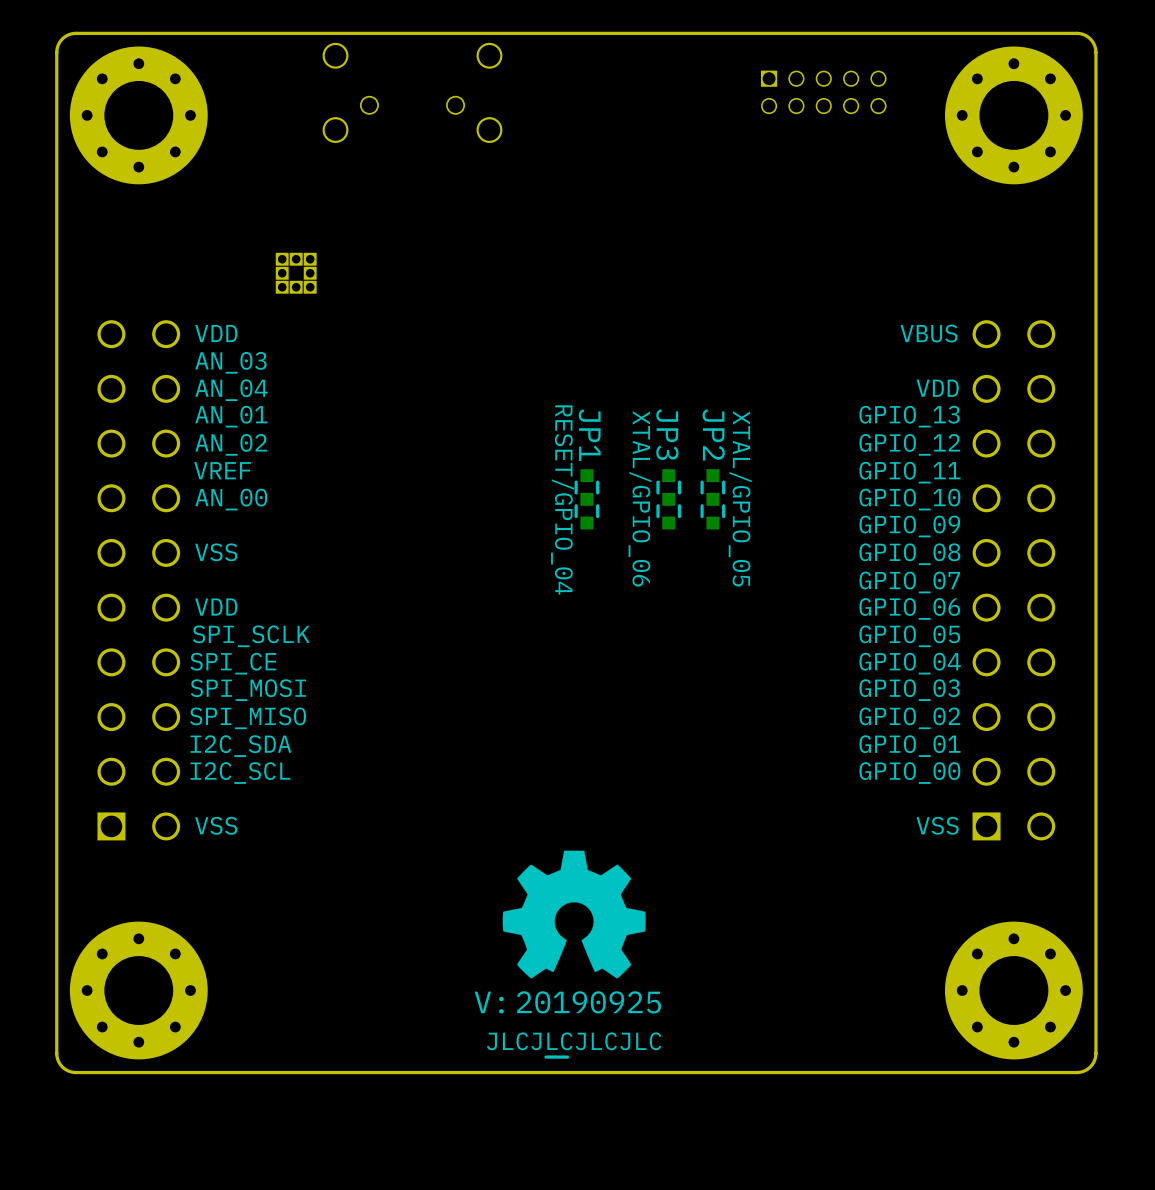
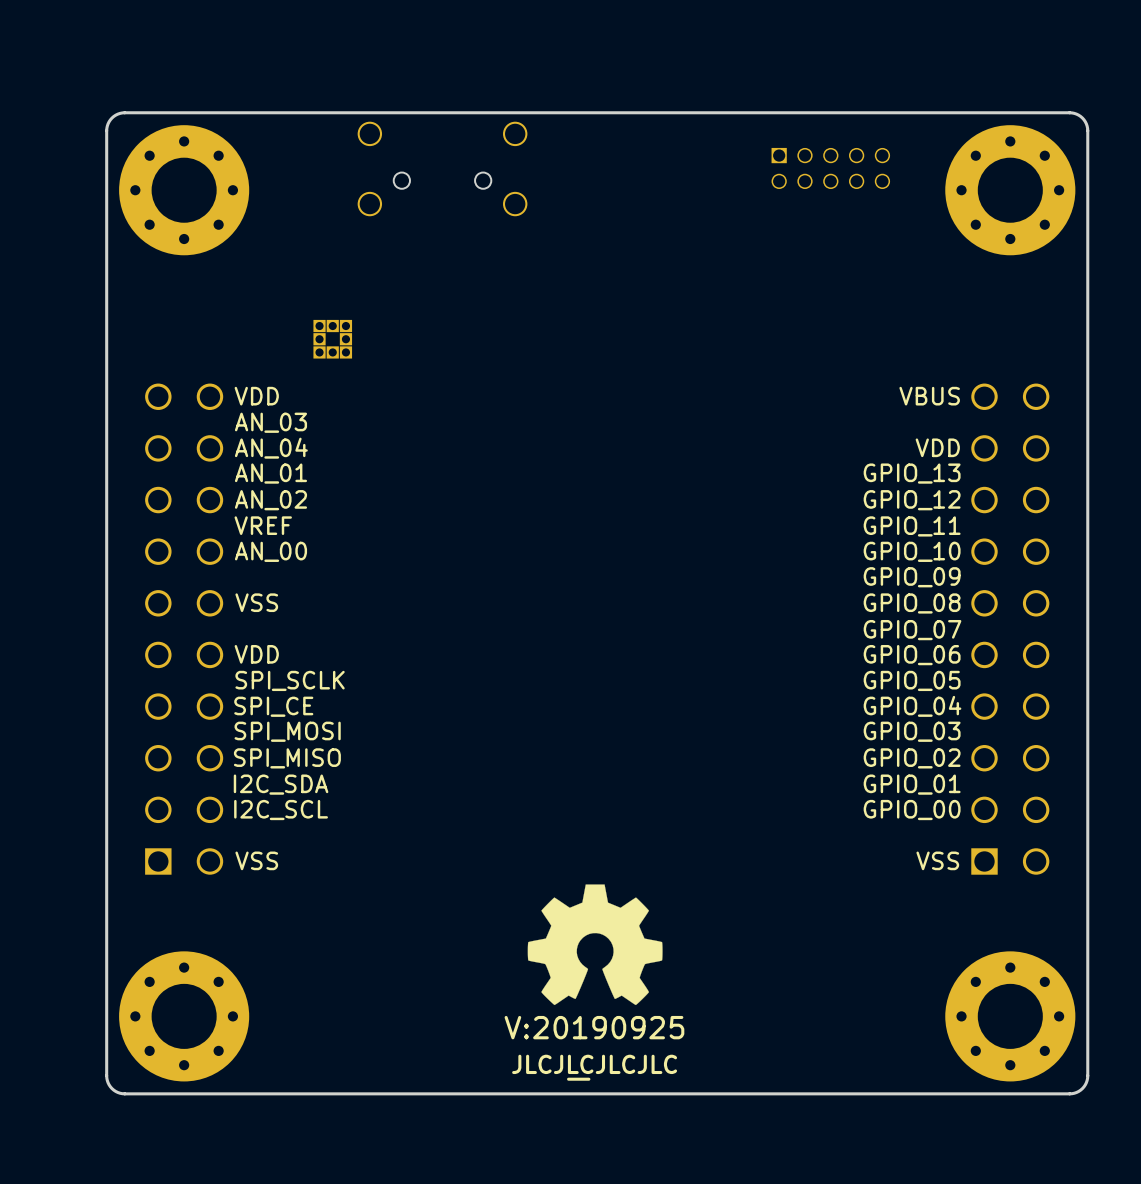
JP1: RESET/GPIO_04 (586, 499) -> none
JP3: XTAL/GPIO_06 (668, 499) -> none
JP2: XTAL/GPIO_05 (712, 499) -> none

